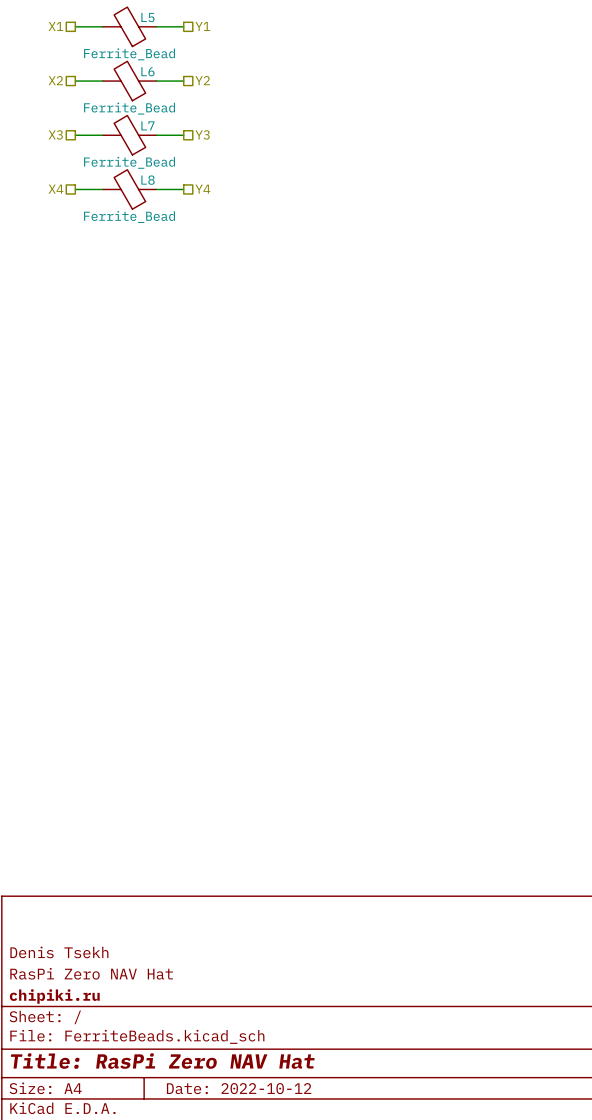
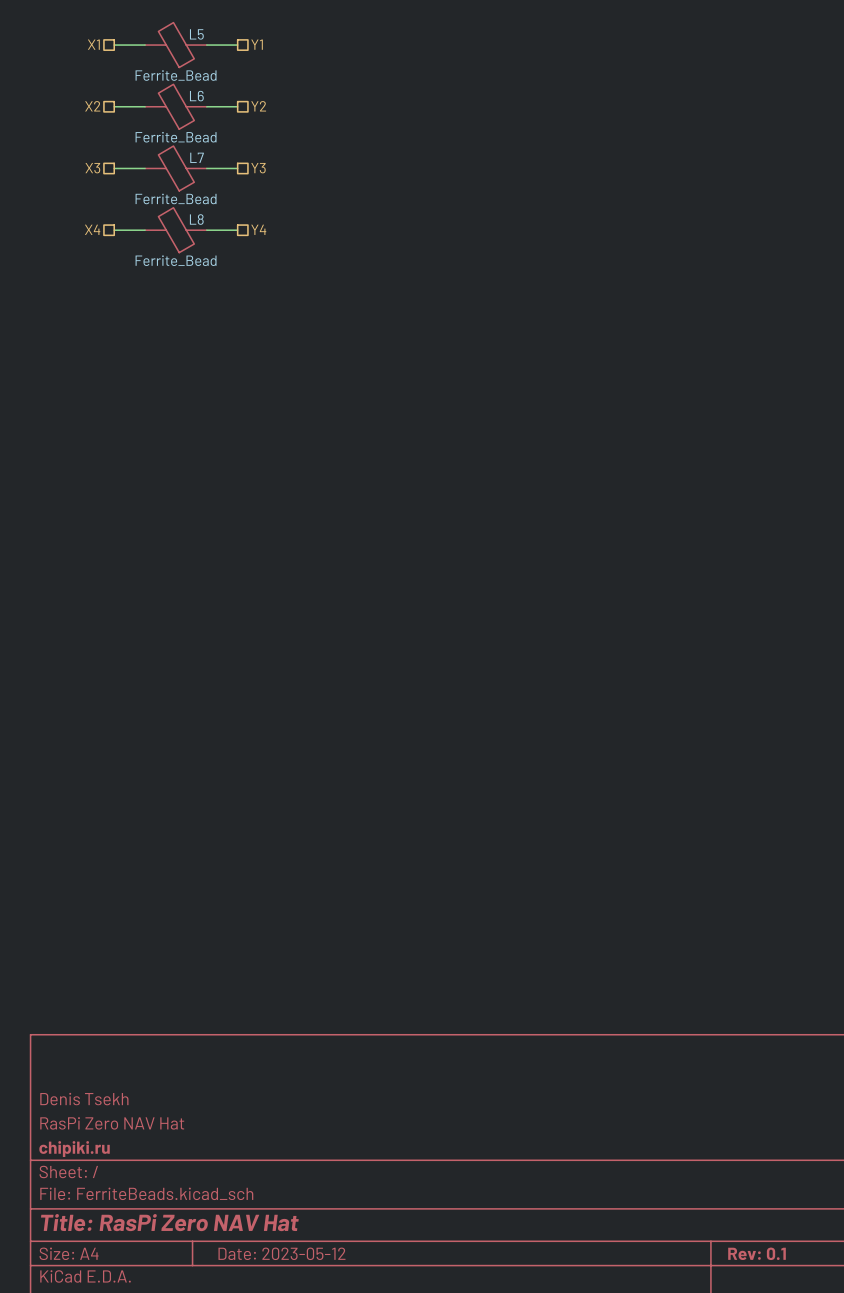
title block: Date: 2022-10-12 (239, 1088) -> Date: 2023-05-12 (281, 1253)

